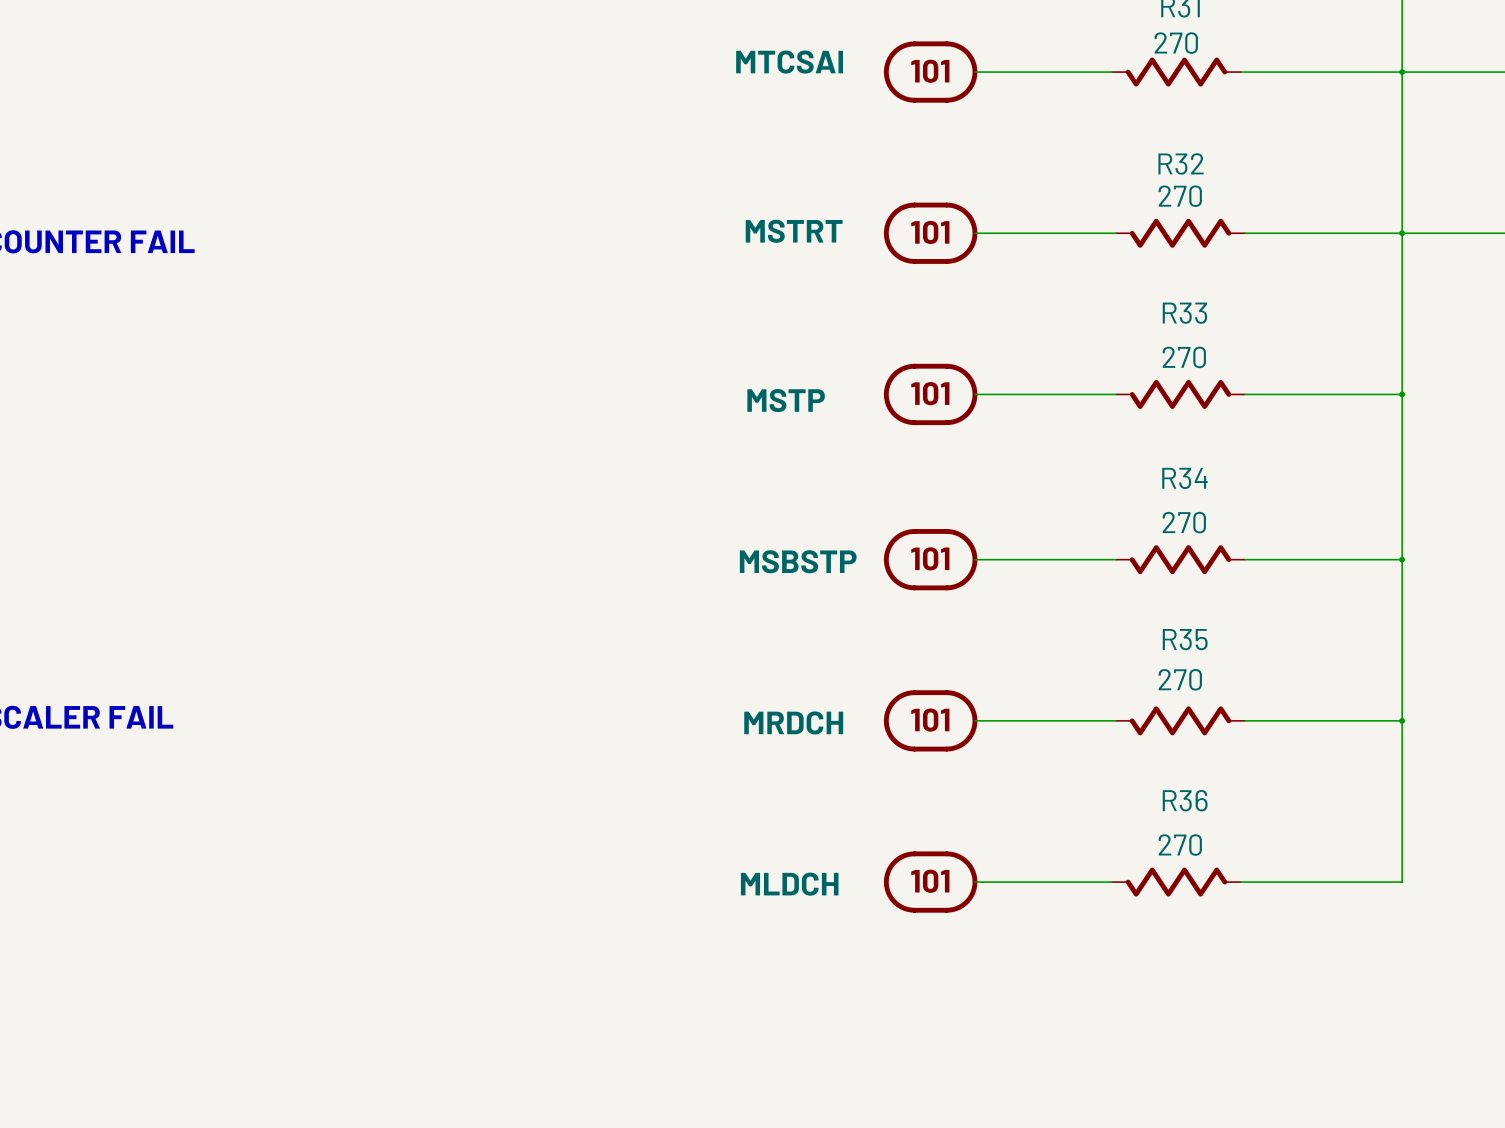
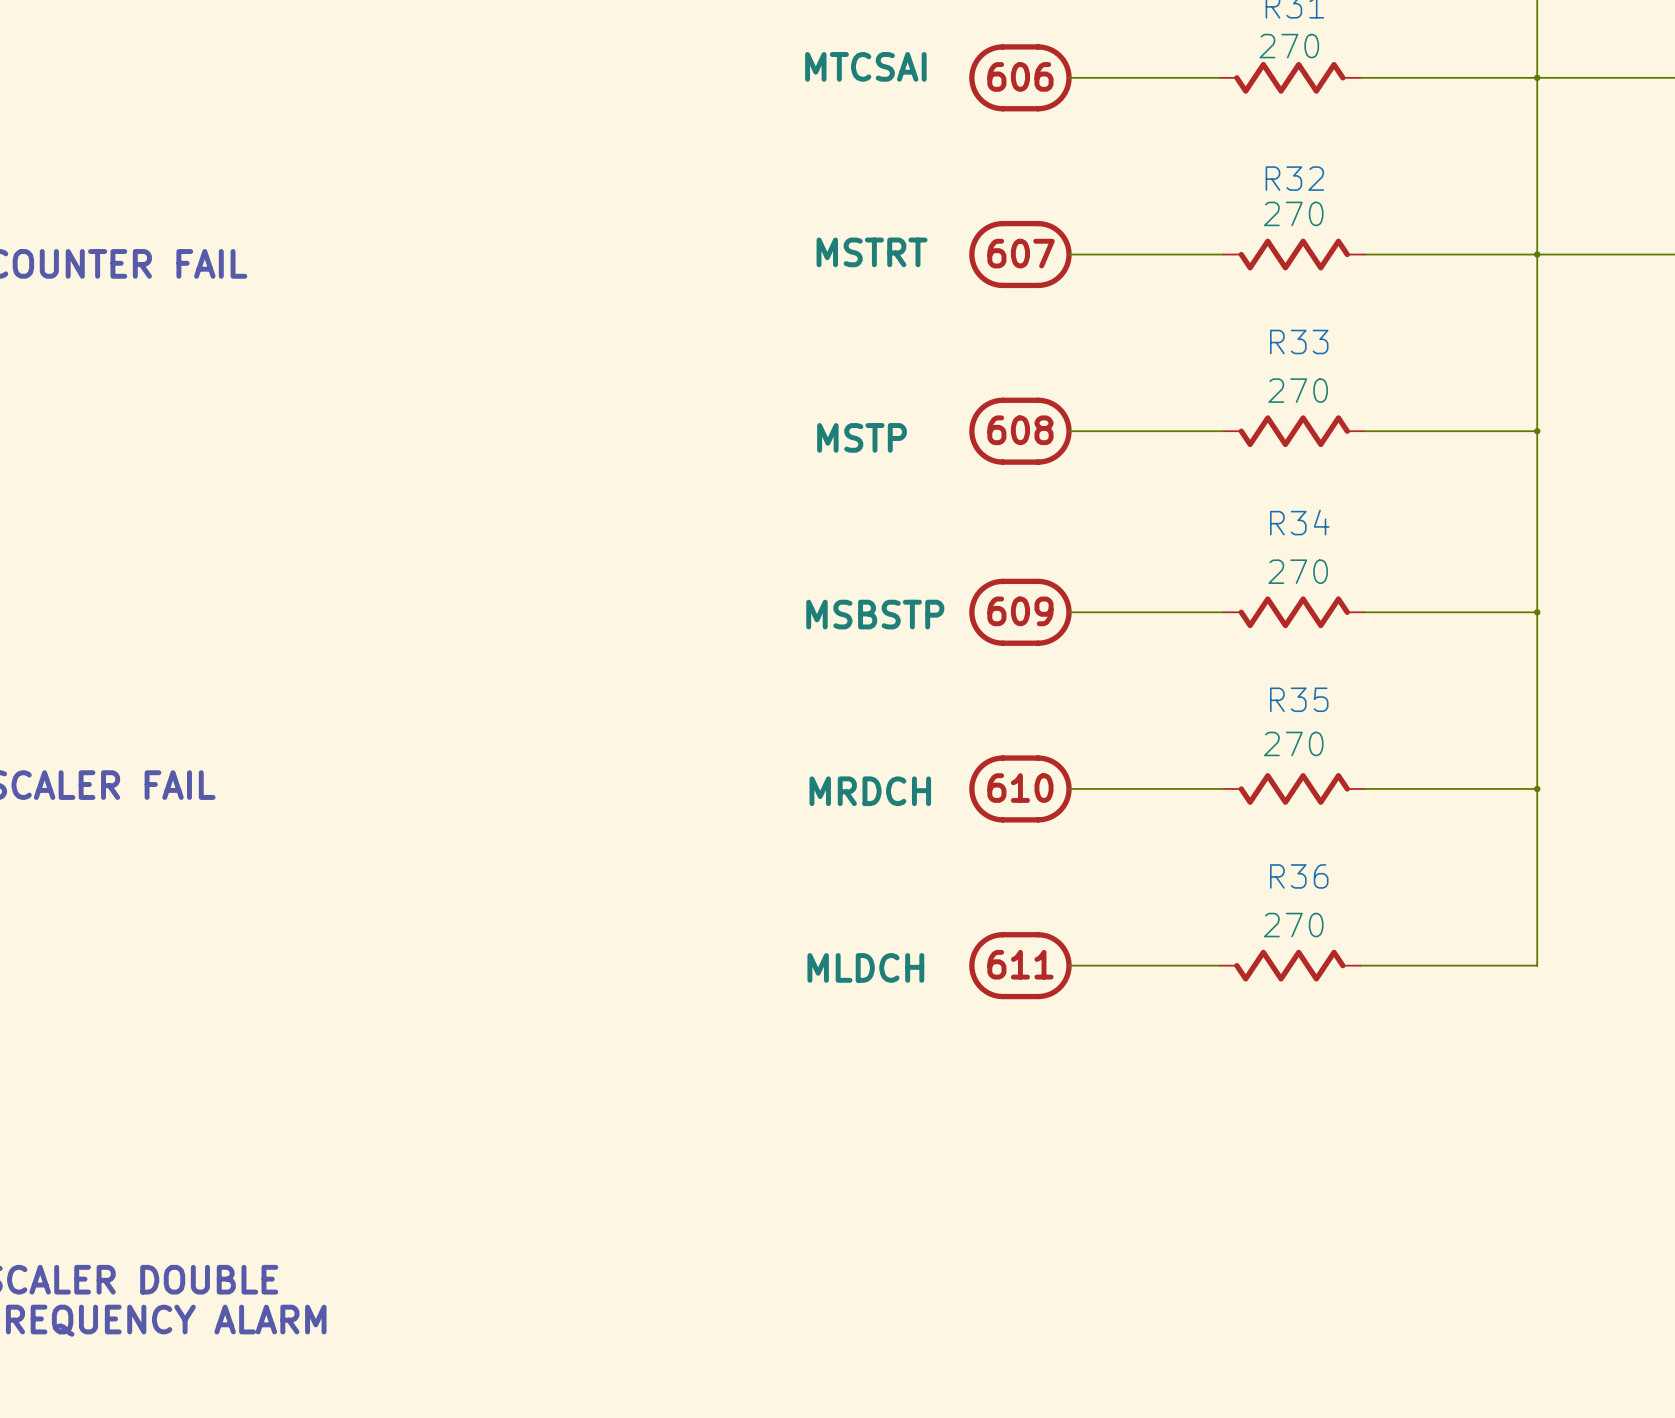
part text: 101 (930, 71) -> 606 (1020, 76)
part text: 101 (930, 232) -> 607 (1021, 253)
part text: 101 (930, 393) -> 608 (1020, 430)
part text: 101 (930, 558) -> 609 (1020, 611)
part text: 101 (930, 720) -> 610 (1020, 788)
part text: 101 (930, 881) -> 611 (1020, 964)

